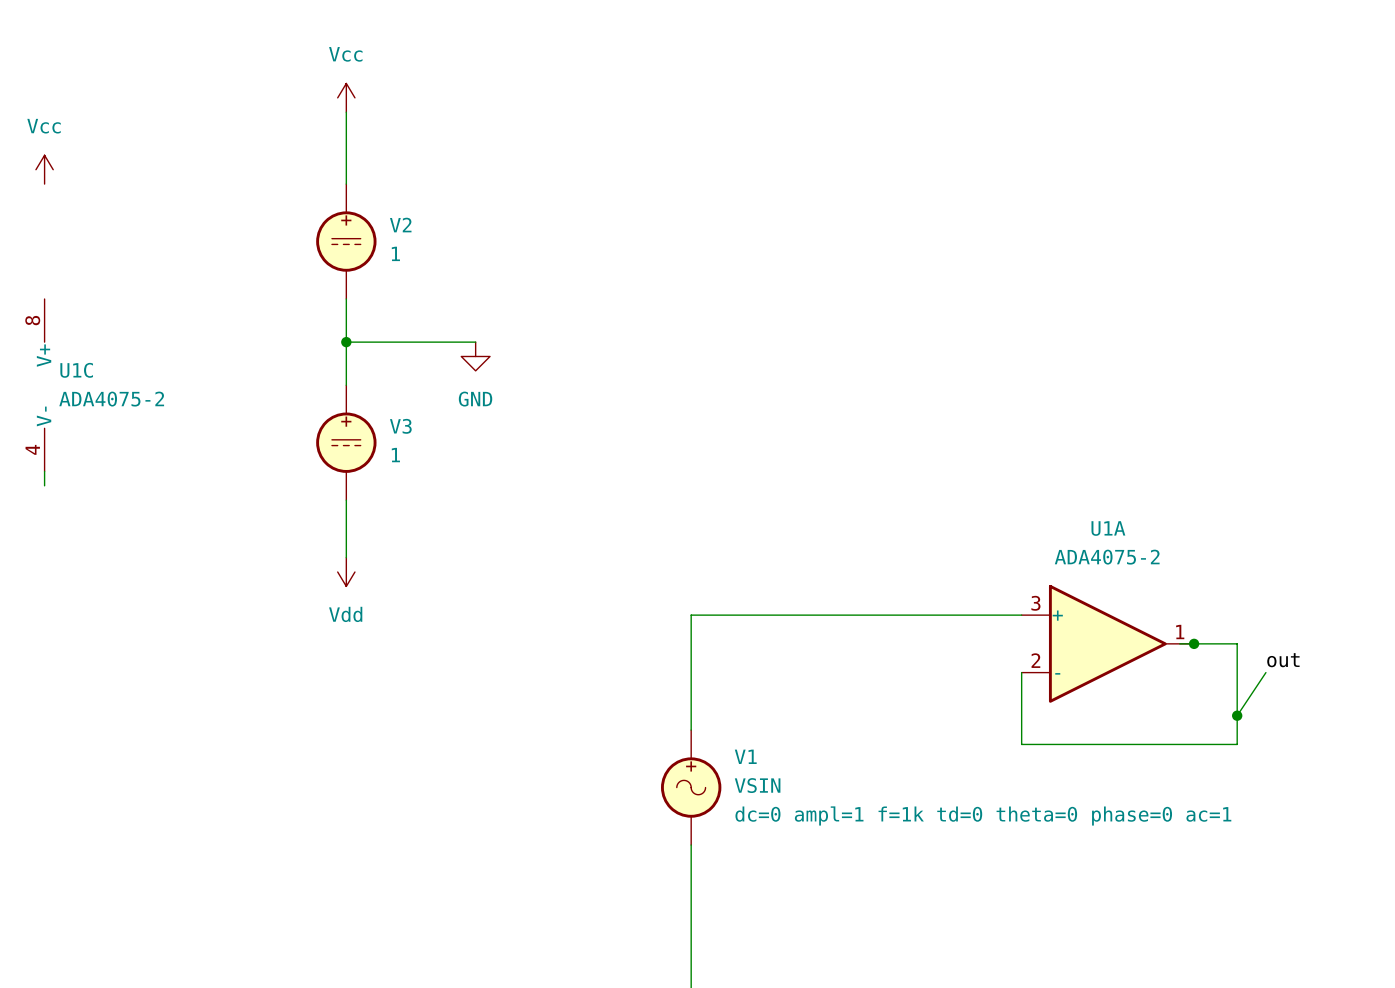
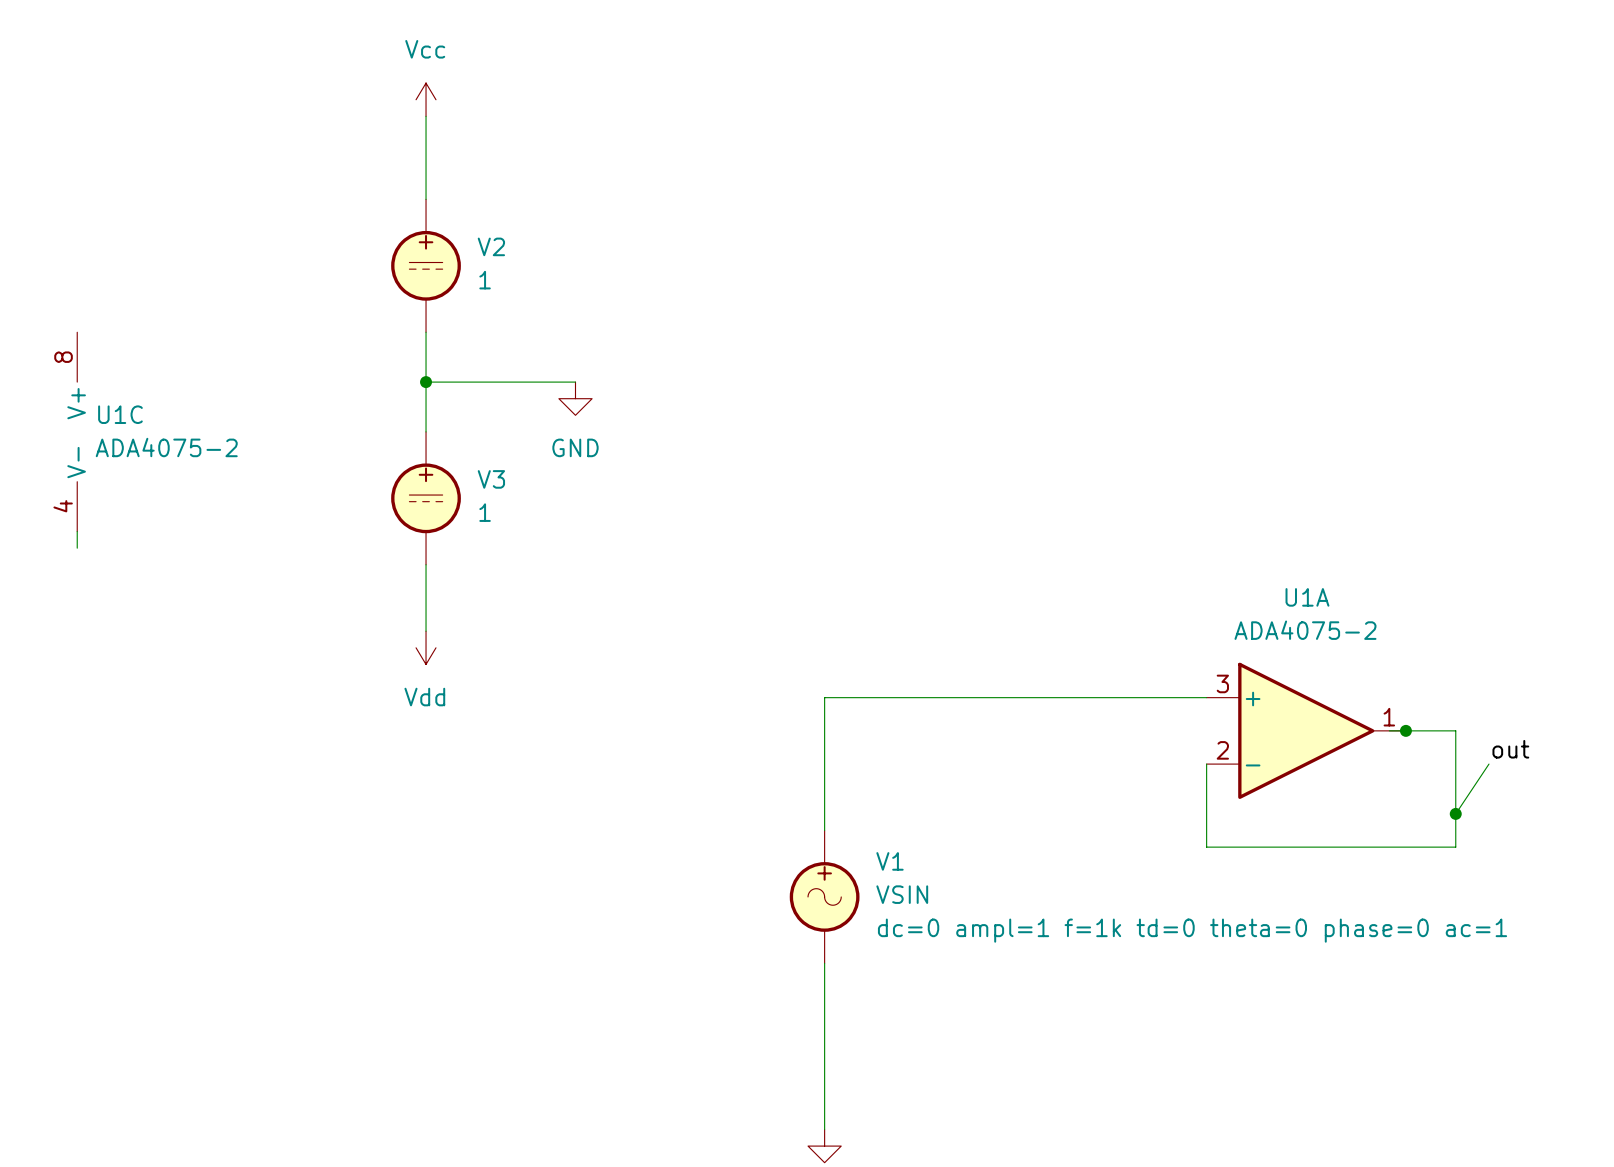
power symbol: Vcc (44, 169) -> none

